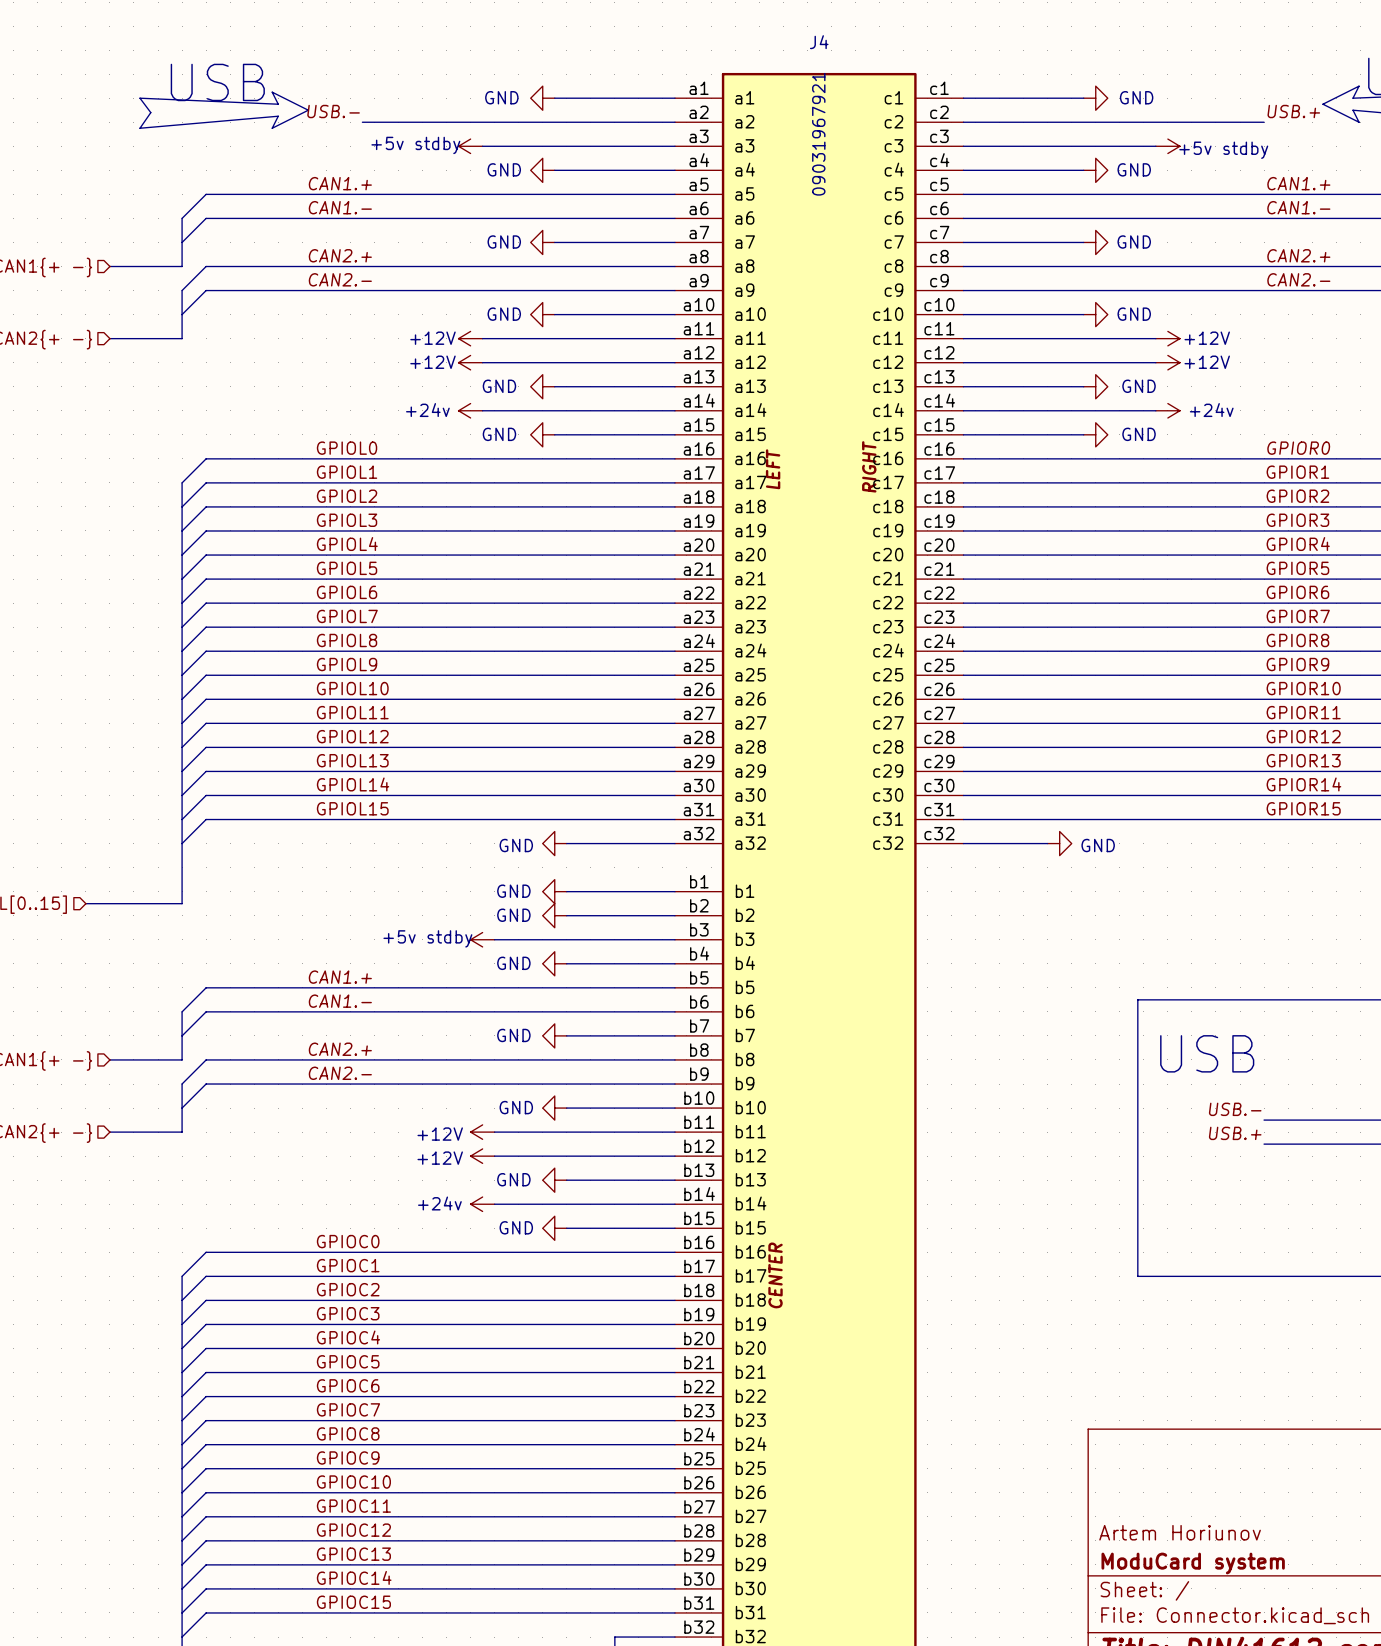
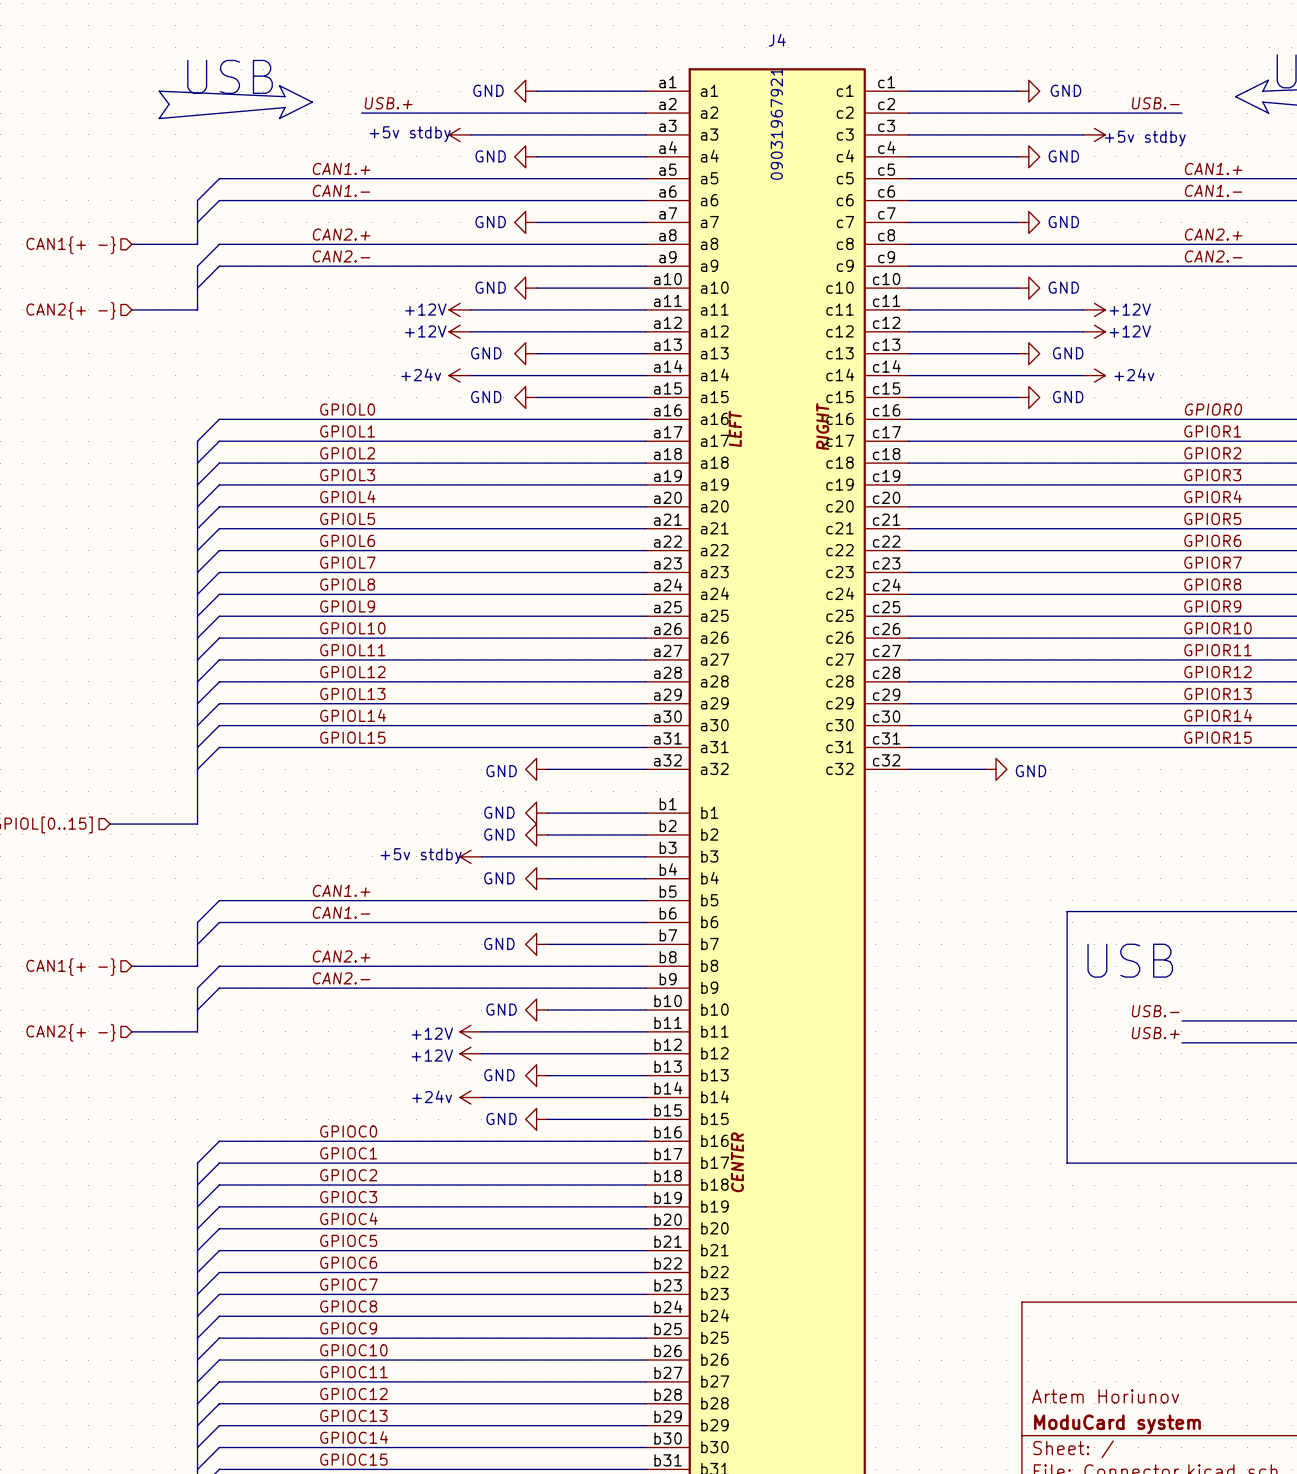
label: USB.- (333, 111) -> USB.+ (388, 103)
label: USB.+ (1293, 111) -> USB.- (1155, 103)

